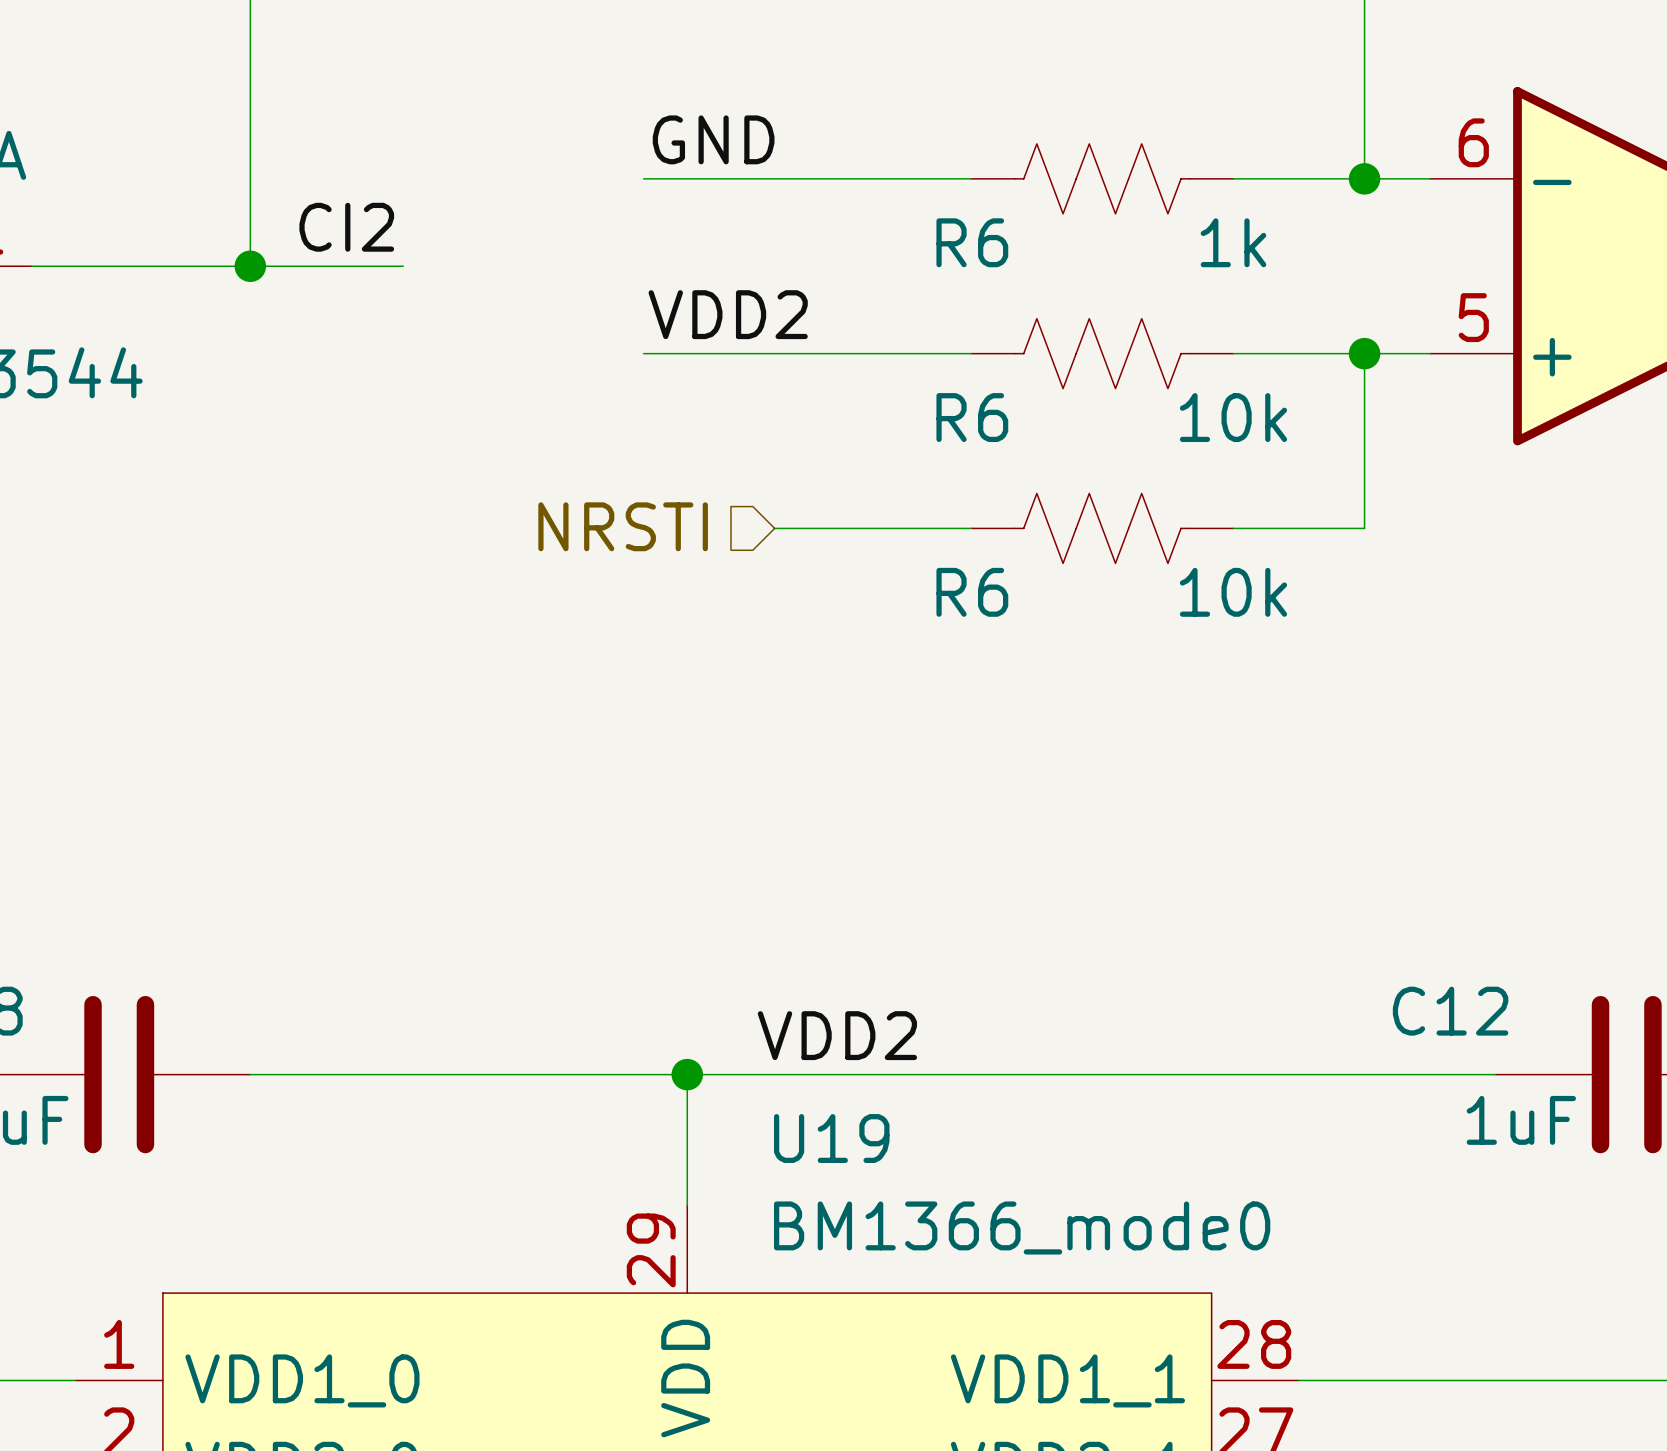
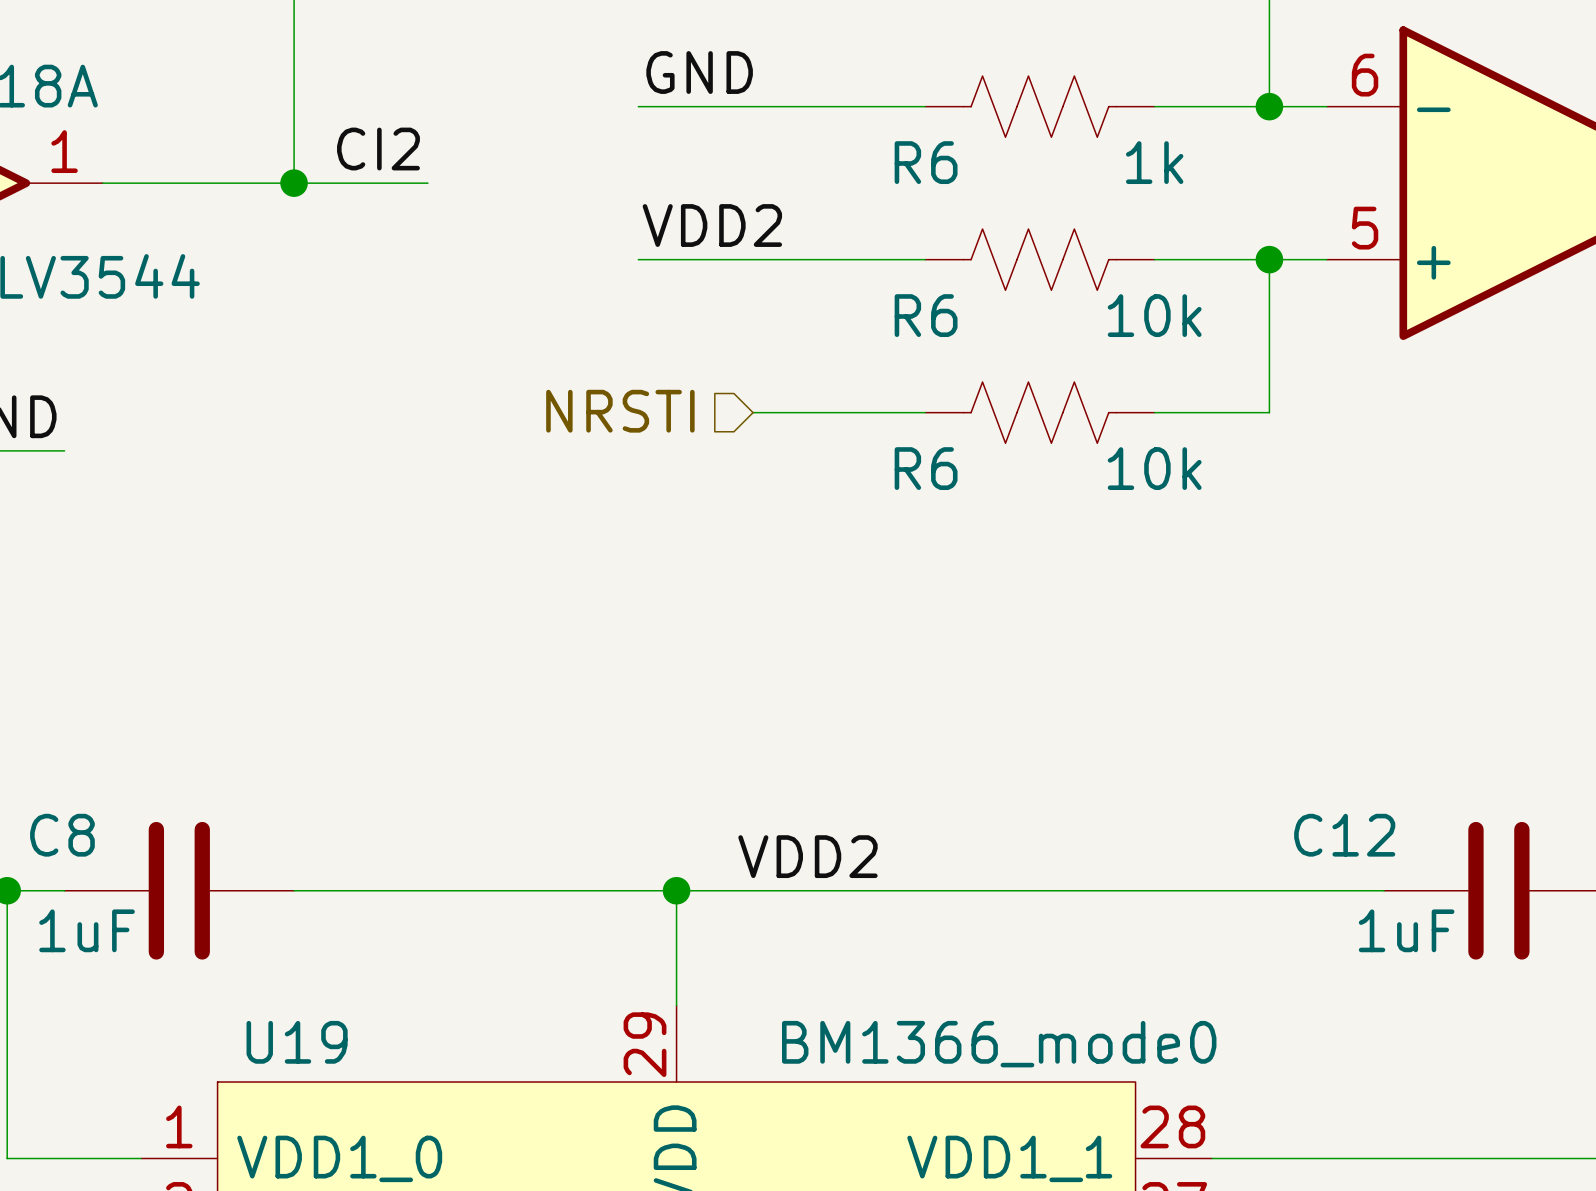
U19 name position: U19 (831, 1138) -> U19 (297, 1042)
U19 value position: BM1366_mode0 (1022, 1228) -> BM1366_mode0 (999, 1044)

